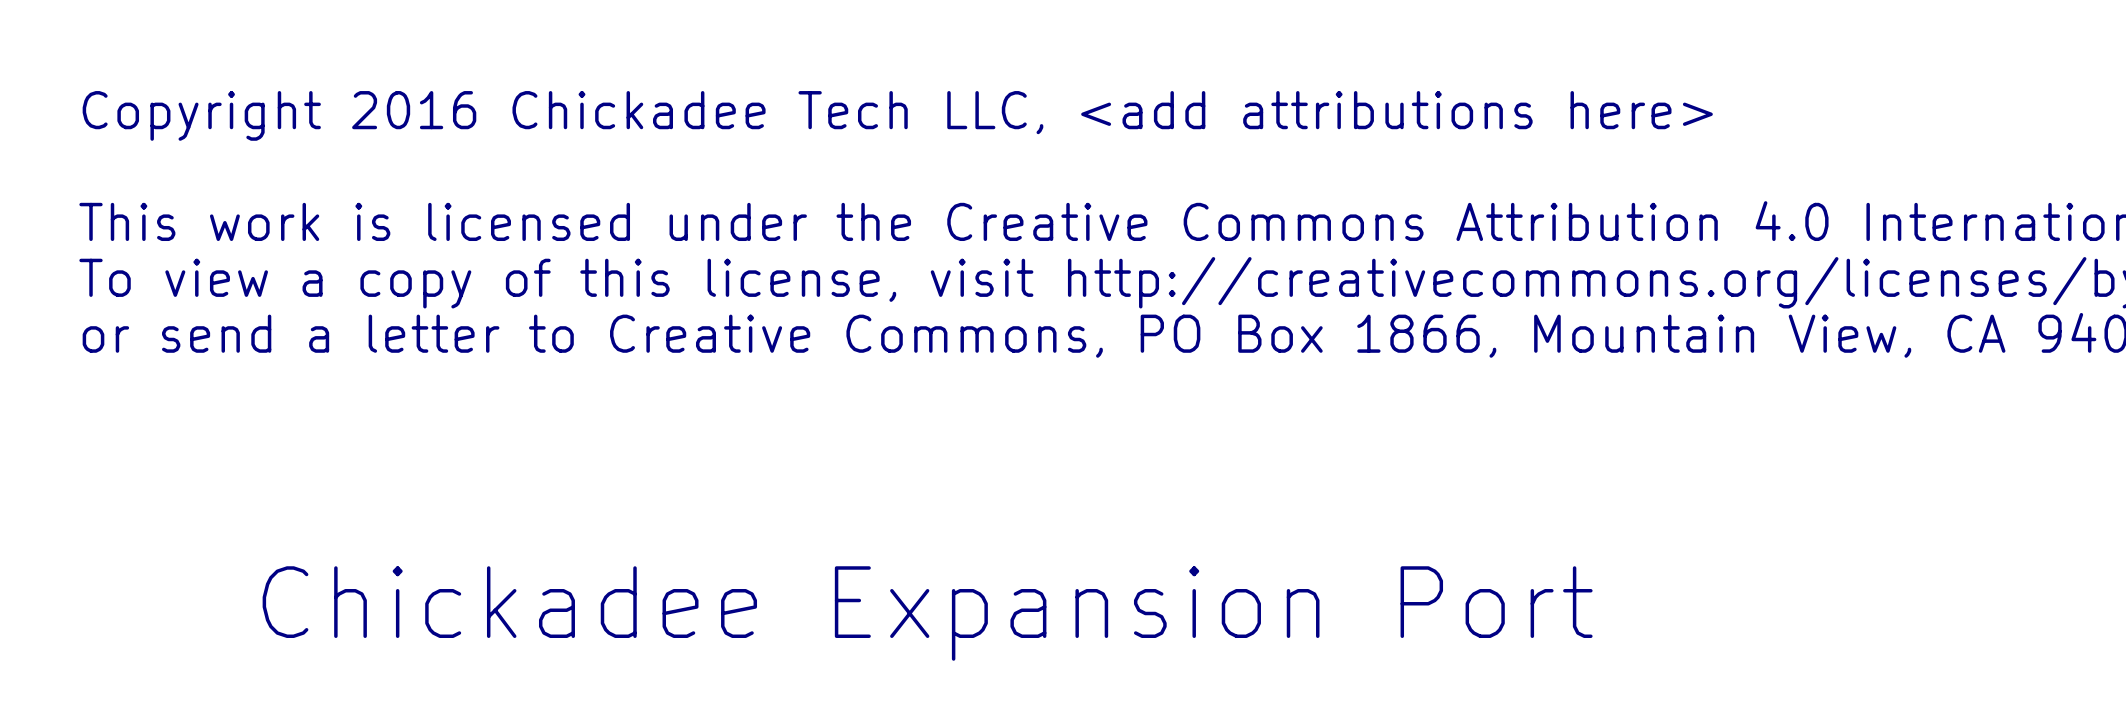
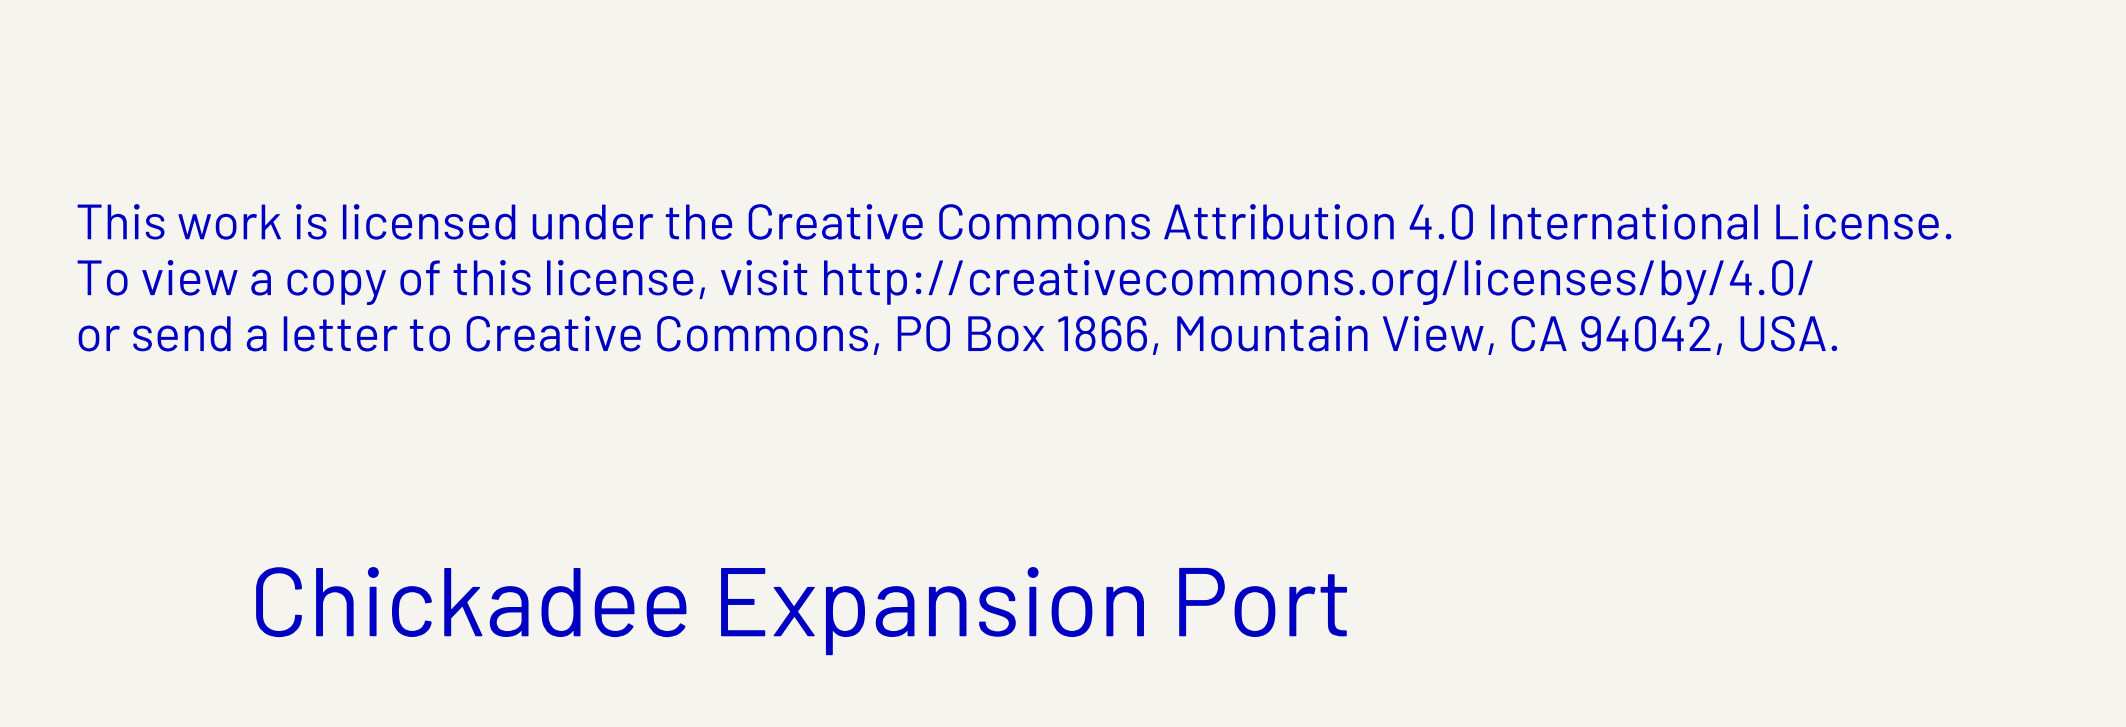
text: Copyright 2016 Chickadee Tech LLC, <add attributions here> (897, 115) -> none

